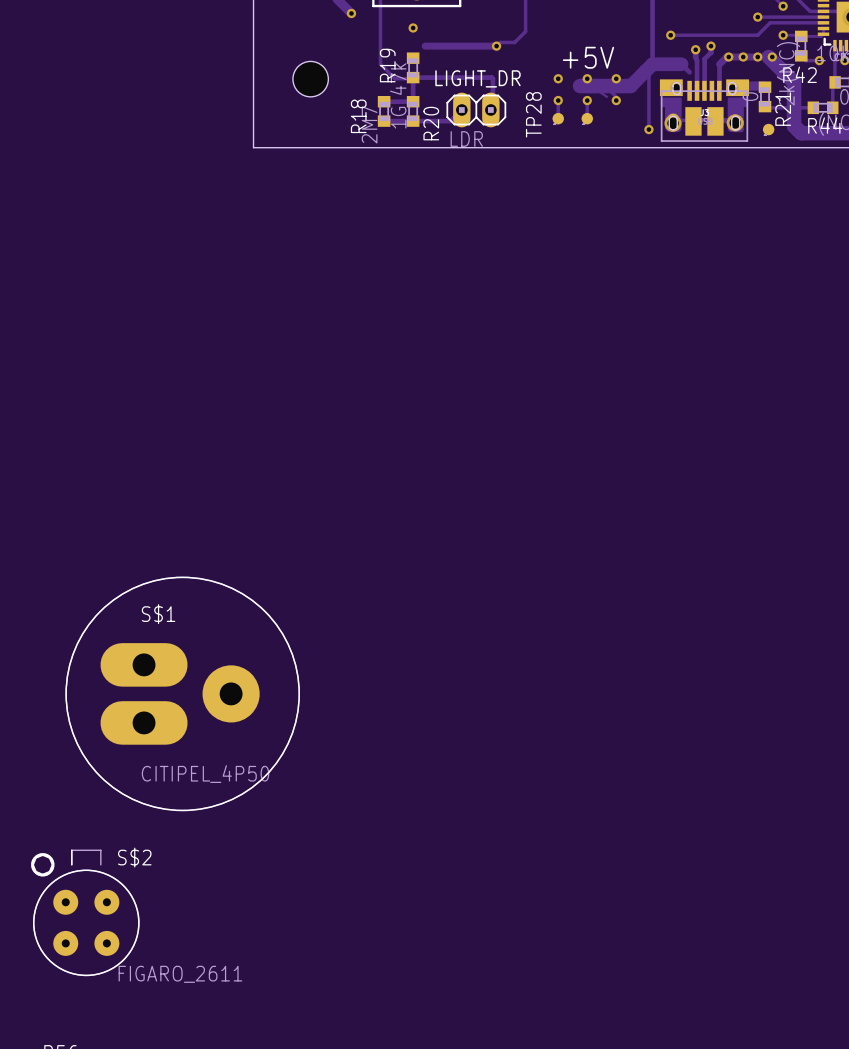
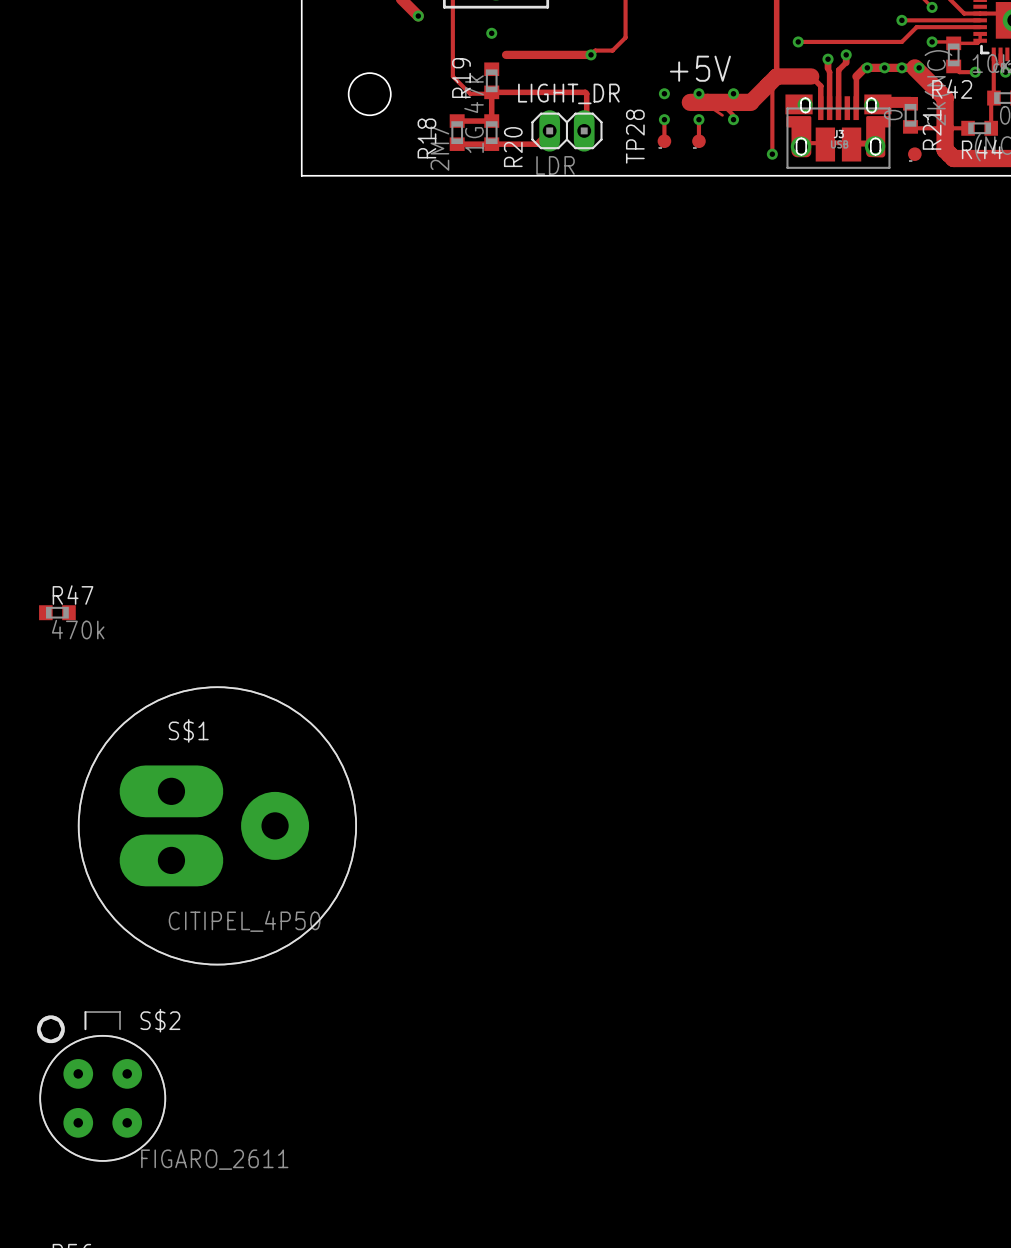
track: none -> (820, 86) (820, 108)
R47: none -> 470k (57, 612)

